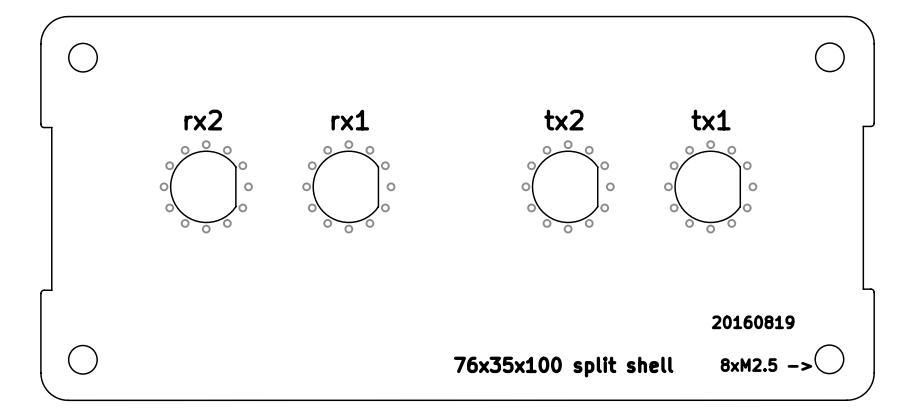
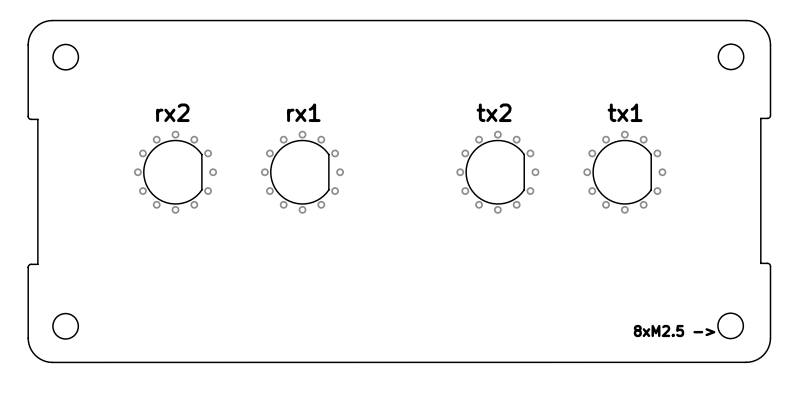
text: 20160819 (753, 322) -> none
text: 76x35x100 split shell (563, 367) -> none

